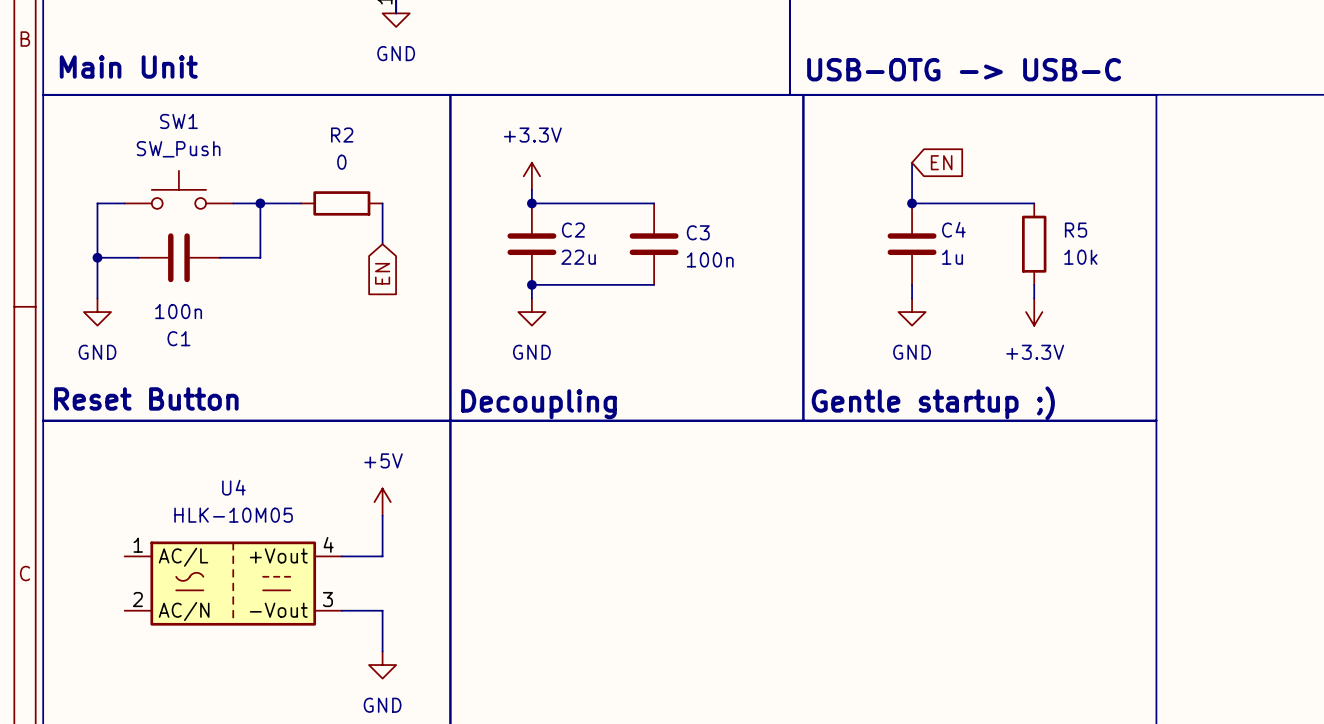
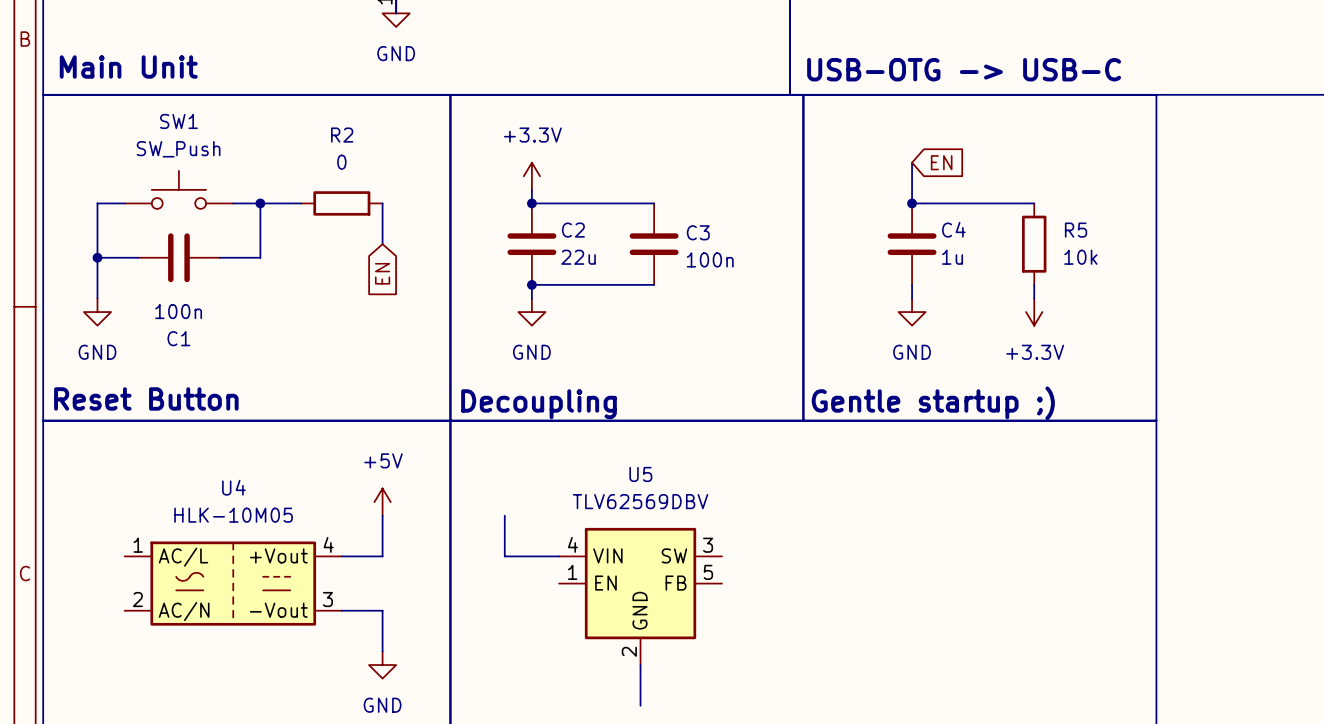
wire: none -> (504, 515) (504, 556) (559, 556)
U5: none -> TLV62569DBV (640, 596)
wire: none -> (640, 665) (640, 705)

